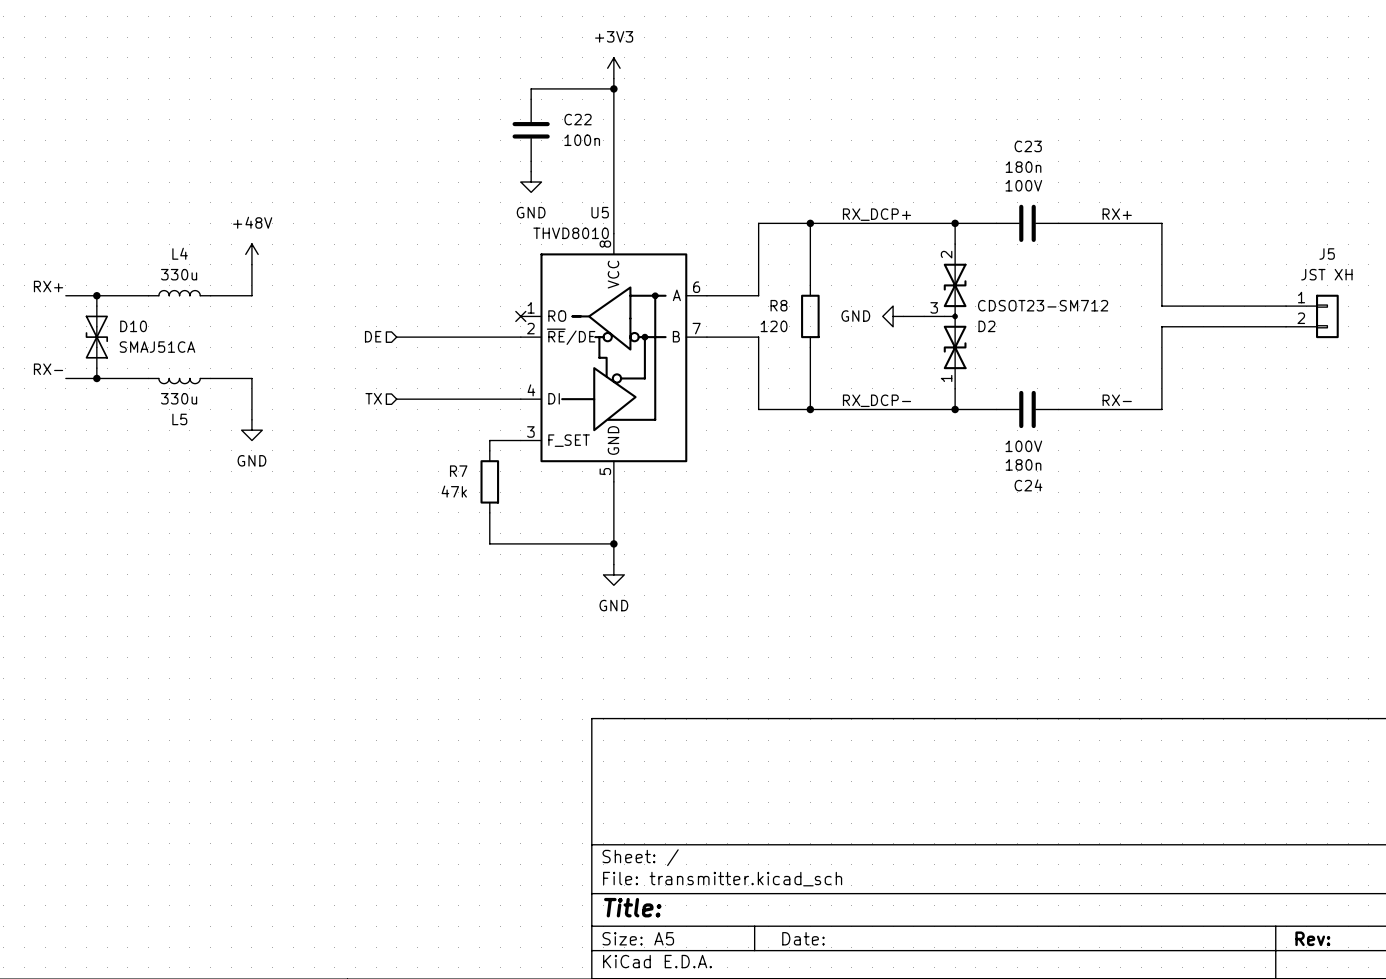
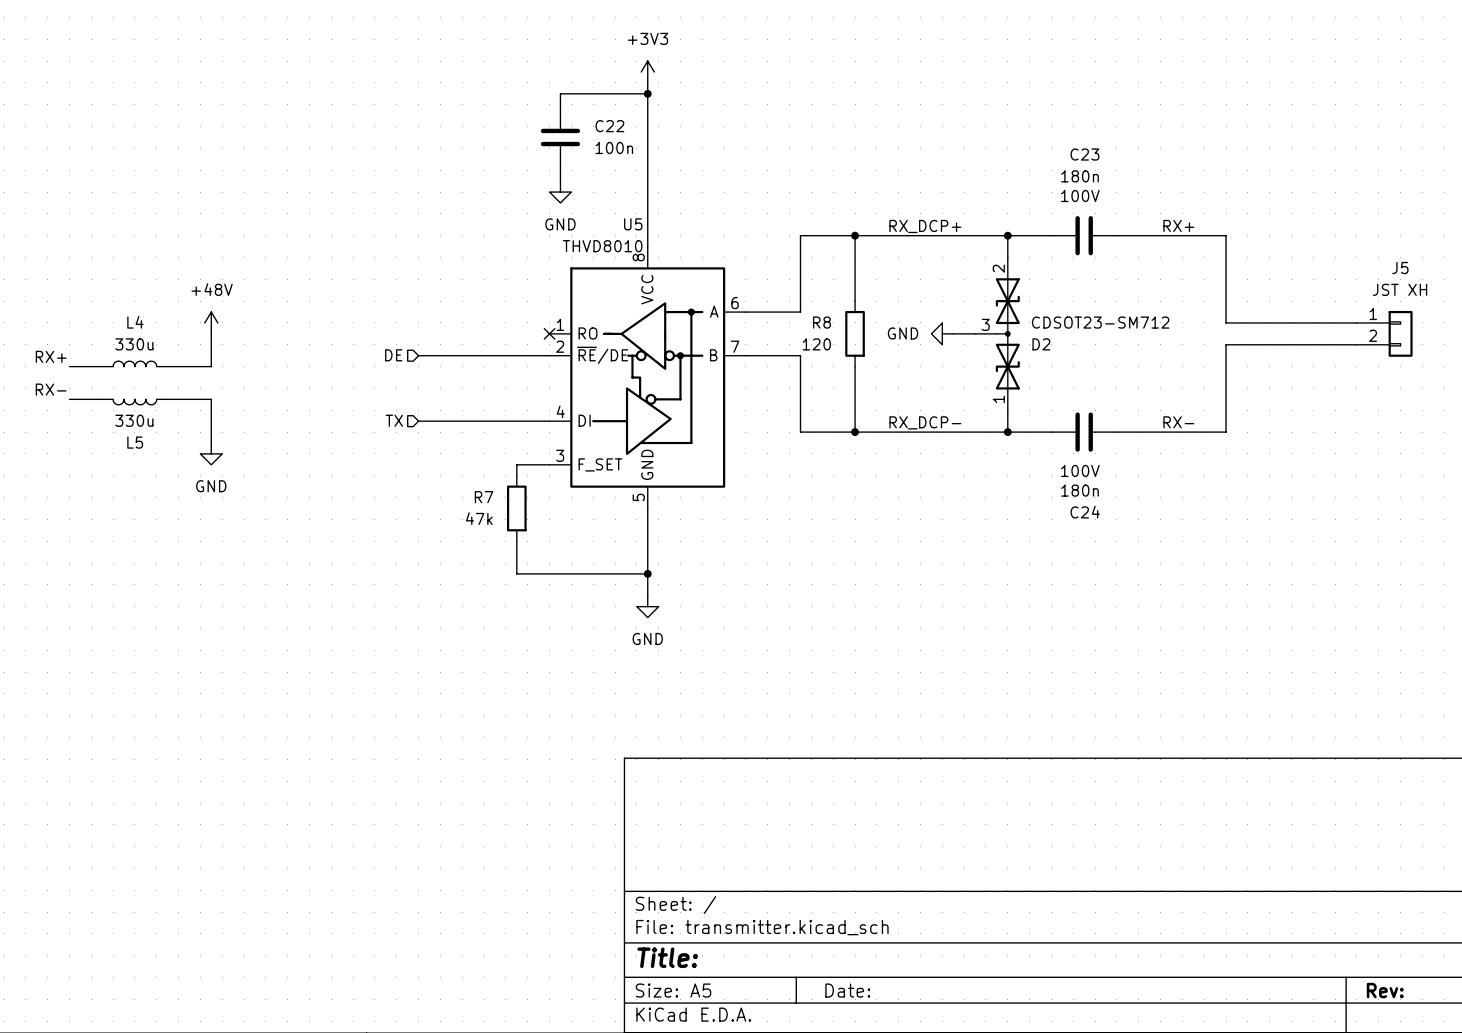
power symbol position: +48V (251, 254) -> +48V (211, 322)
wire: (251, 264) (251, 295) (210, 295) -> (211, 333) (211, 366) (167, 366)
label position: RX+ (48, 286) -> RX+ (51, 356)
L4 position: (179, 293) -> (134, 363)
wire: (65, 295) (148, 295) -> none
wire: (96, 295) (96, 306) -> none
junction: (96, 295) -> none
D10: SMAJ51CA (96, 337) -> none
wire: none -> (69, 366) (102, 366)
wire: (96, 368) (96, 378) (148, 378) -> none
junction: (96, 378) -> none
wire: (210, 378) (251, 378) (251, 419) -> (167, 399) (211, 399) (211, 442)
L5 position: (179, 381) -> (134, 402)
power symbol position: GND (251, 430) -> GND (211, 453)

